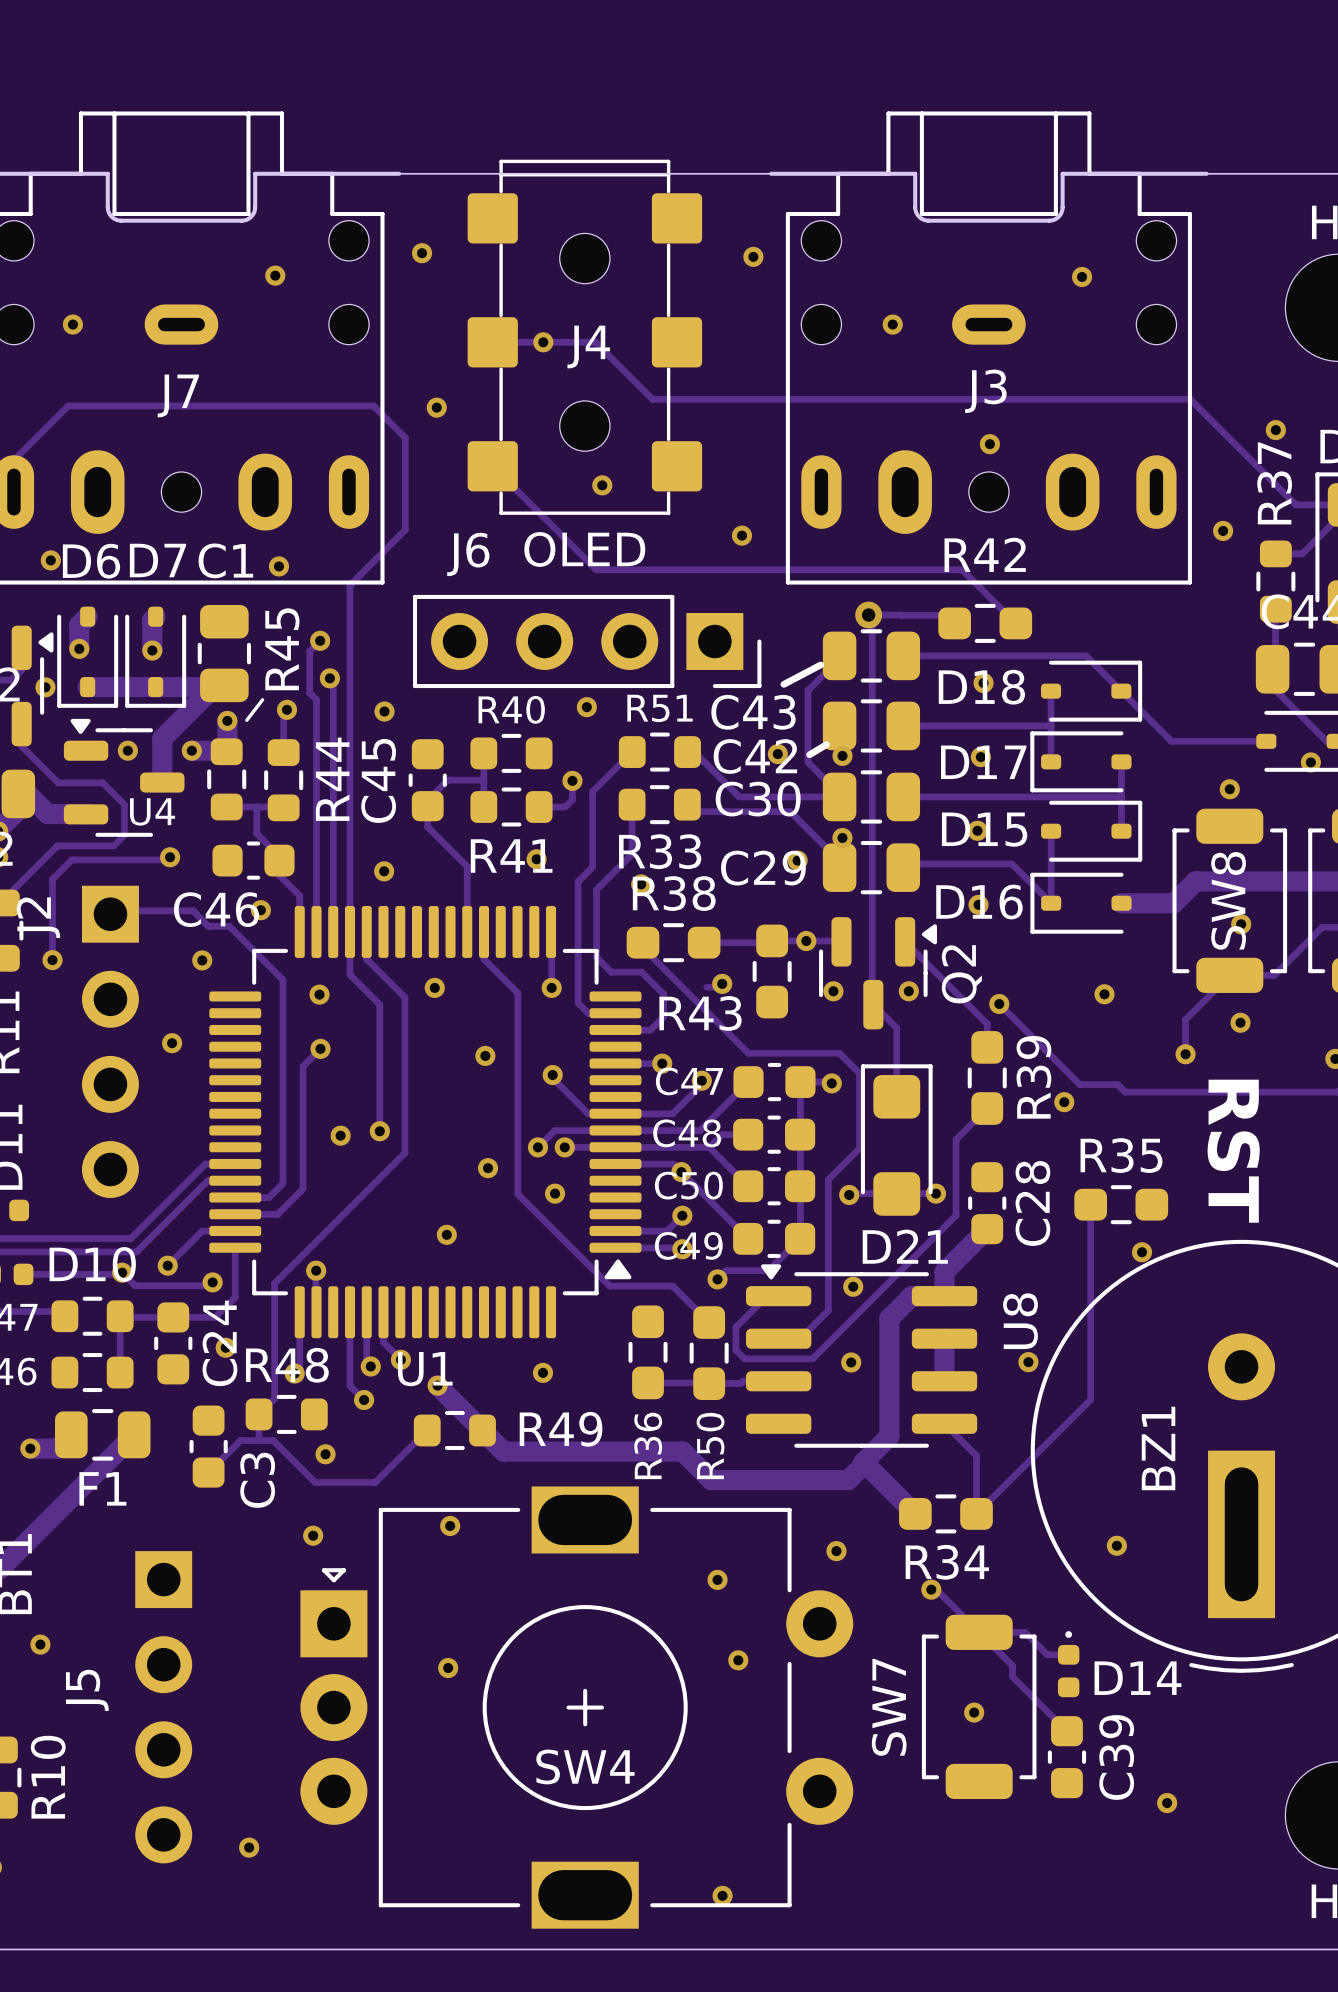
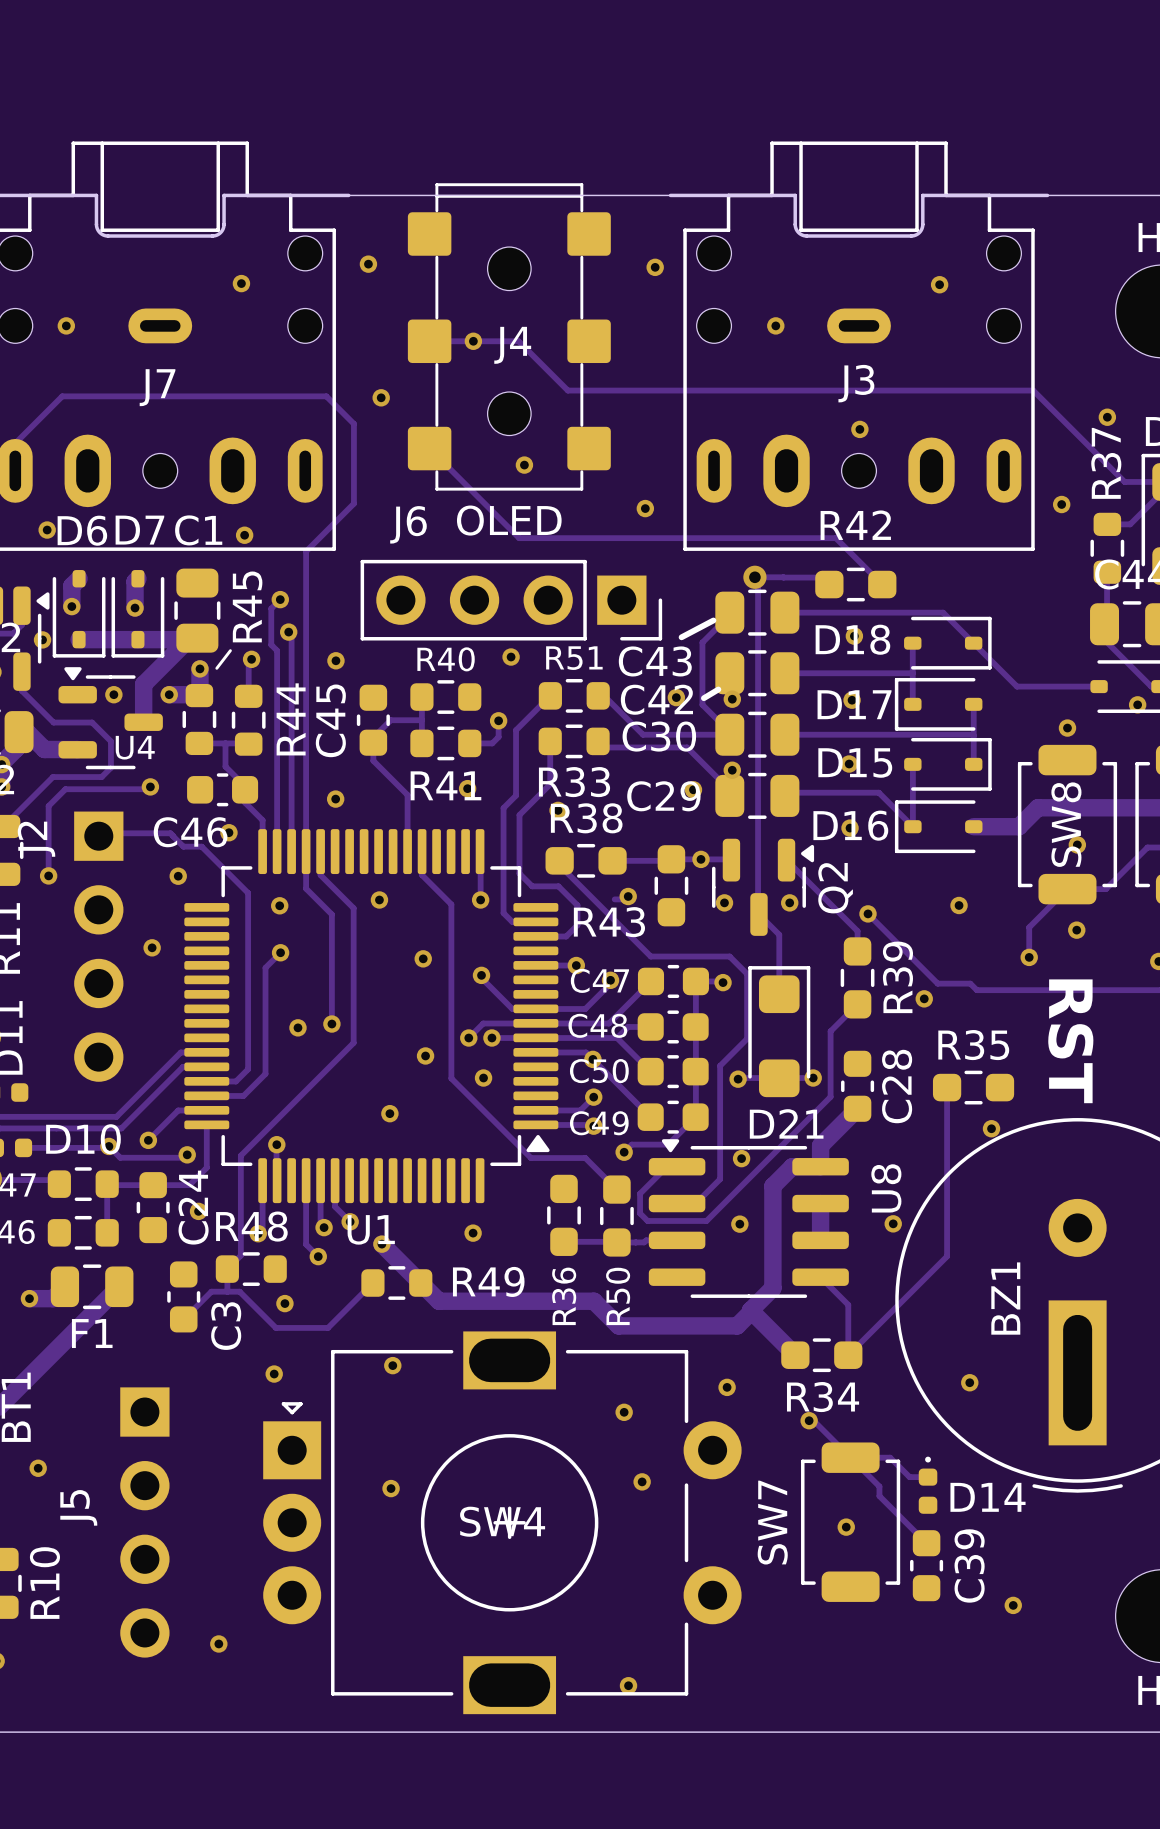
SW4 name position: SW4 (585, 1766) -> SW4 (502, 1521)

